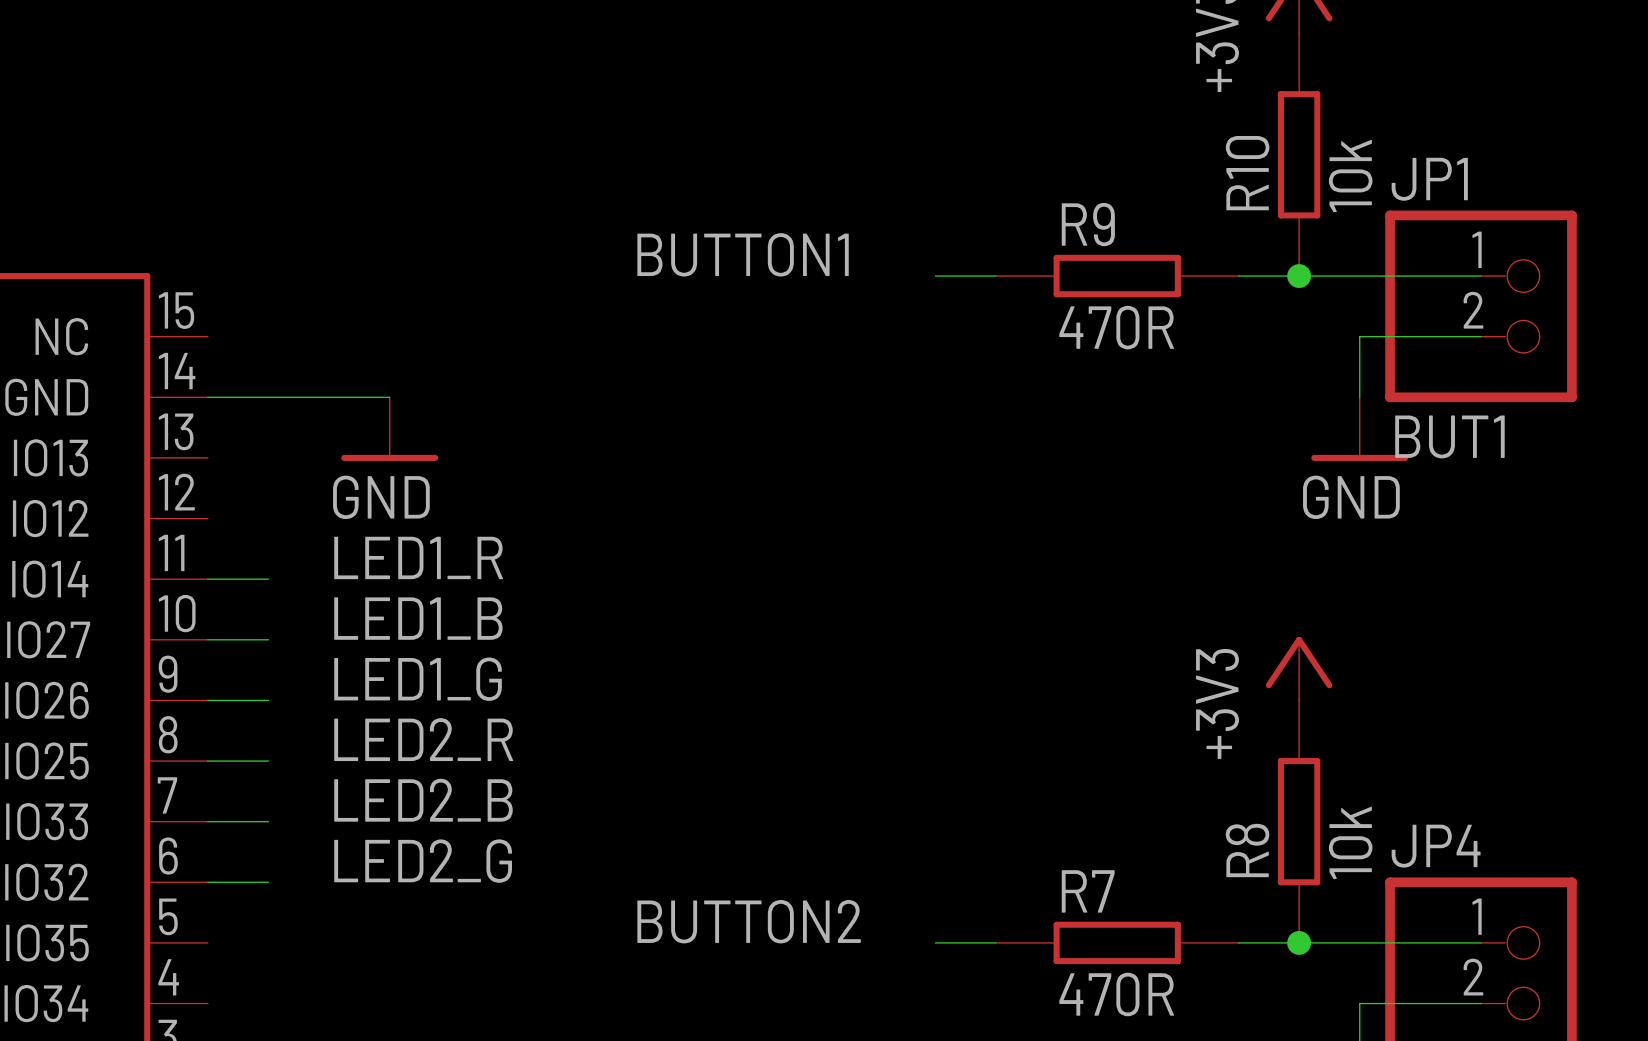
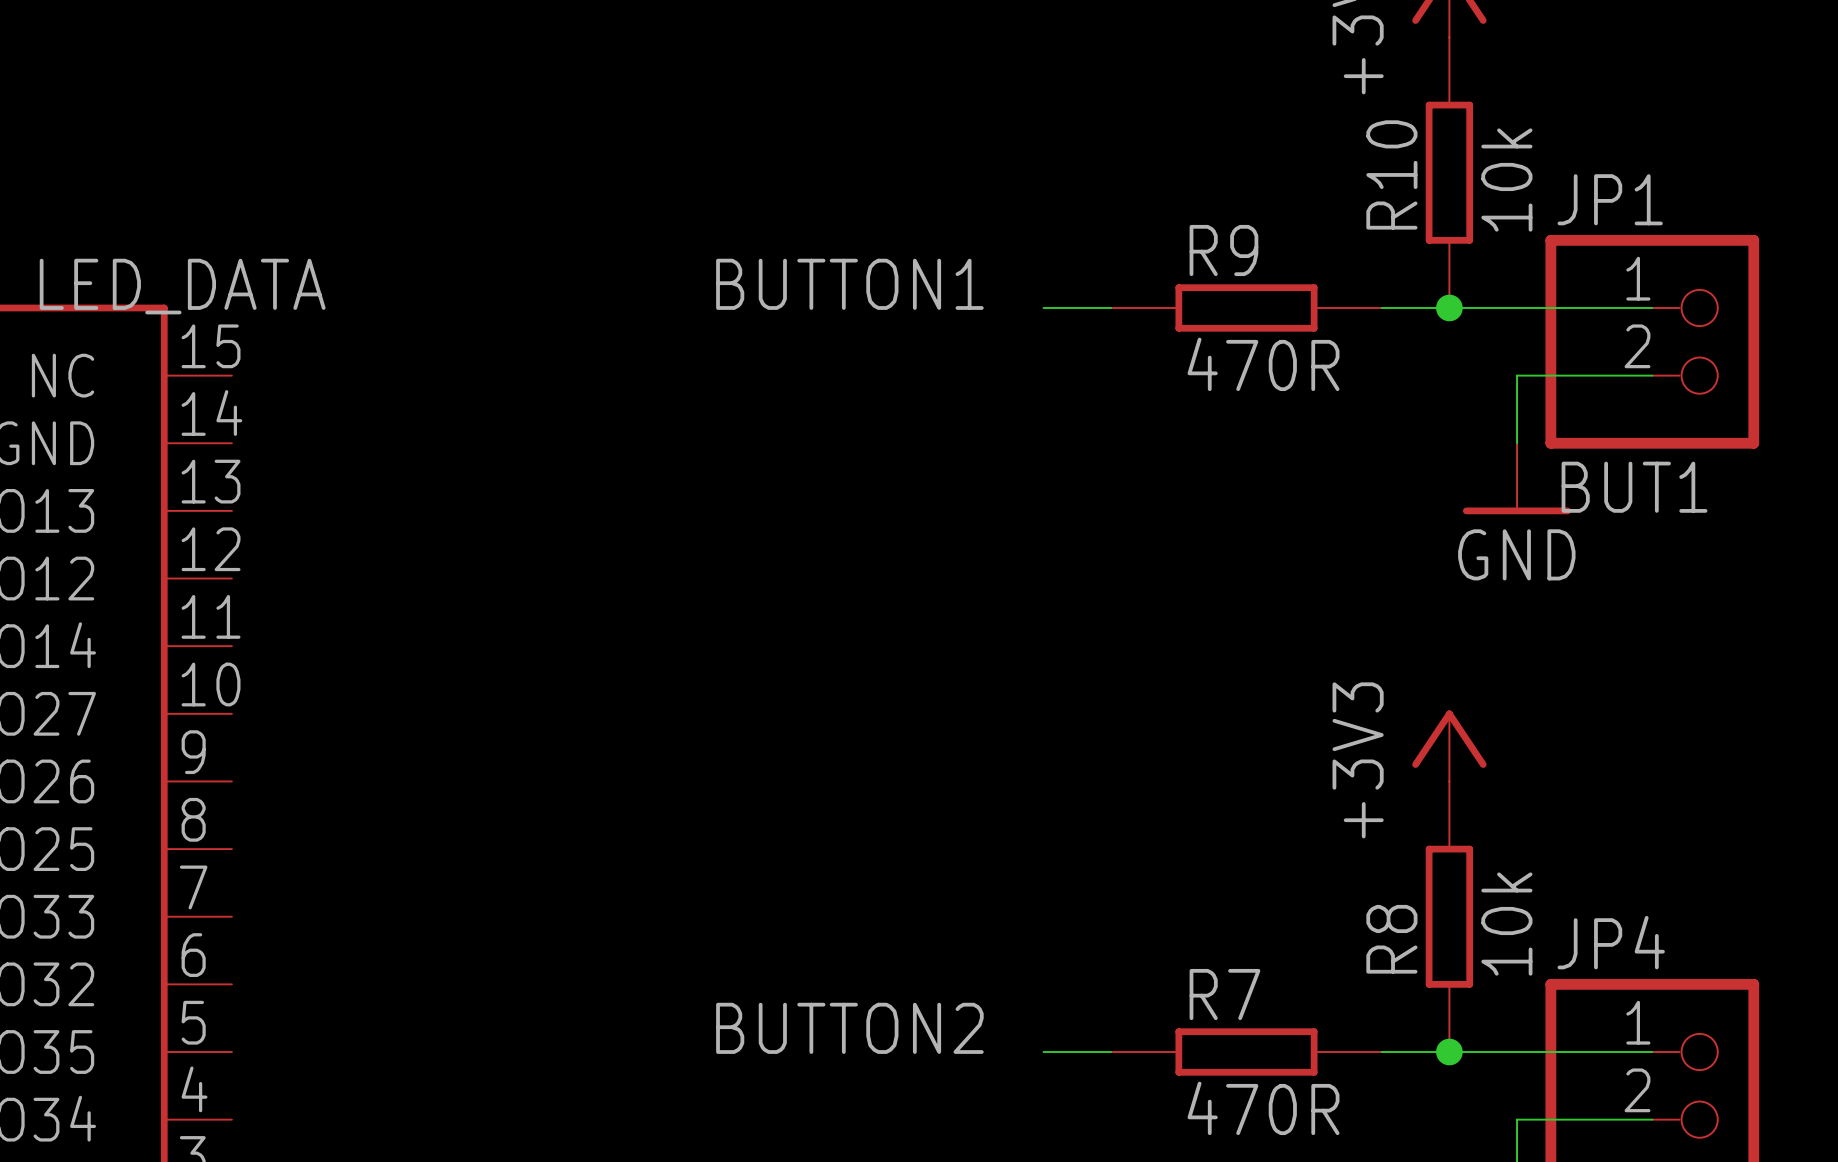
label: none -> LED_DATA (182, 286)
wire: (207, 397) (389, 397) -> none
power symbol: GND (389, 429) -> none
label: LED1_R (418, 557) -> none
wire: (207, 579) (268, 579) -> none
label: LED1_B (418, 618) -> none
wire: (207, 639) (268, 639) -> none
label: LED1_G (418, 679) -> none
wire: (207, 700) (268, 700) -> none
label: LED2_R (423, 739) -> none
wire: (207, 761) (268, 761) -> none
label: LED2_B (423, 800) -> none
wire: (207, 821) (268, 821) -> none
label: LED2_G (423, 861) -> none
wire: (207, 882) (268, 882) -> none

